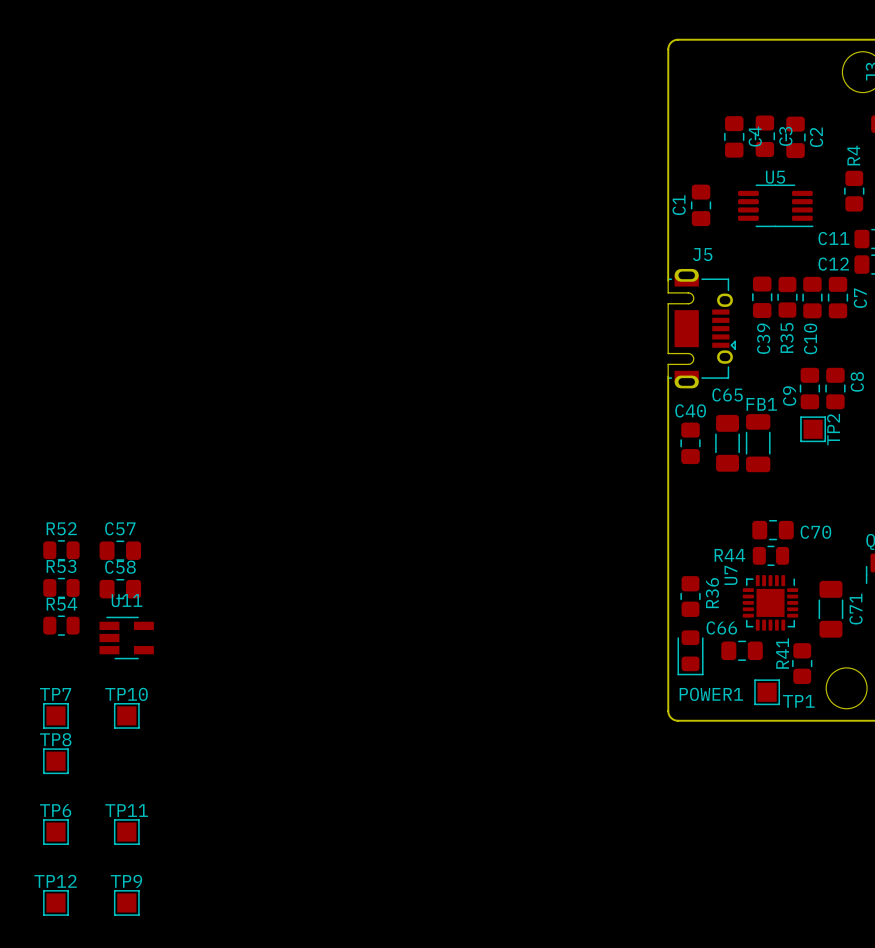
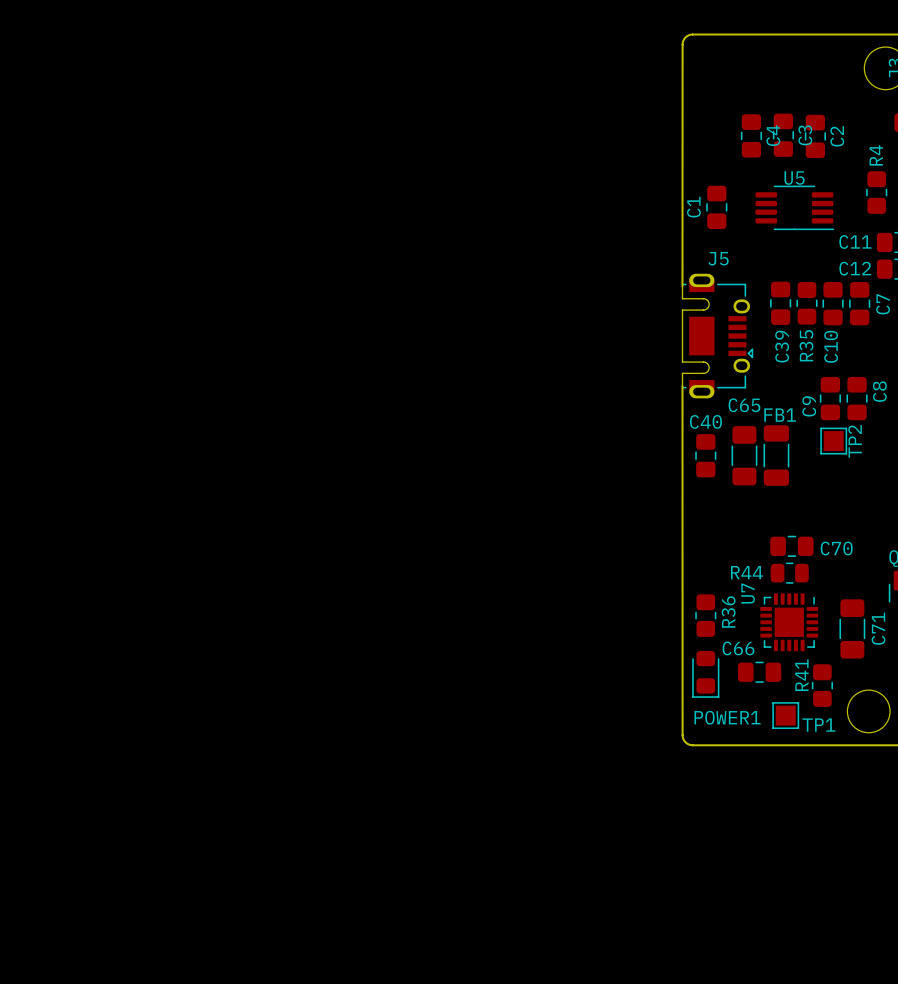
R52: (61, 550) -> none
C57: (120, 550) -> none
R53: (61, 587) -> none
C58: (120, 589) -> none
R54: (61, 625) -> none
U11: (126, 638) -> none
TP7: (55, 715) -> none
TP10: (126, 715) -> none
TP8: (55, 761) -> none
TP6: (55, 832) -> none
TP11: (126, 832) -> none
TP12: (55, 902) -> none
TP9: (126, 902) -> none

